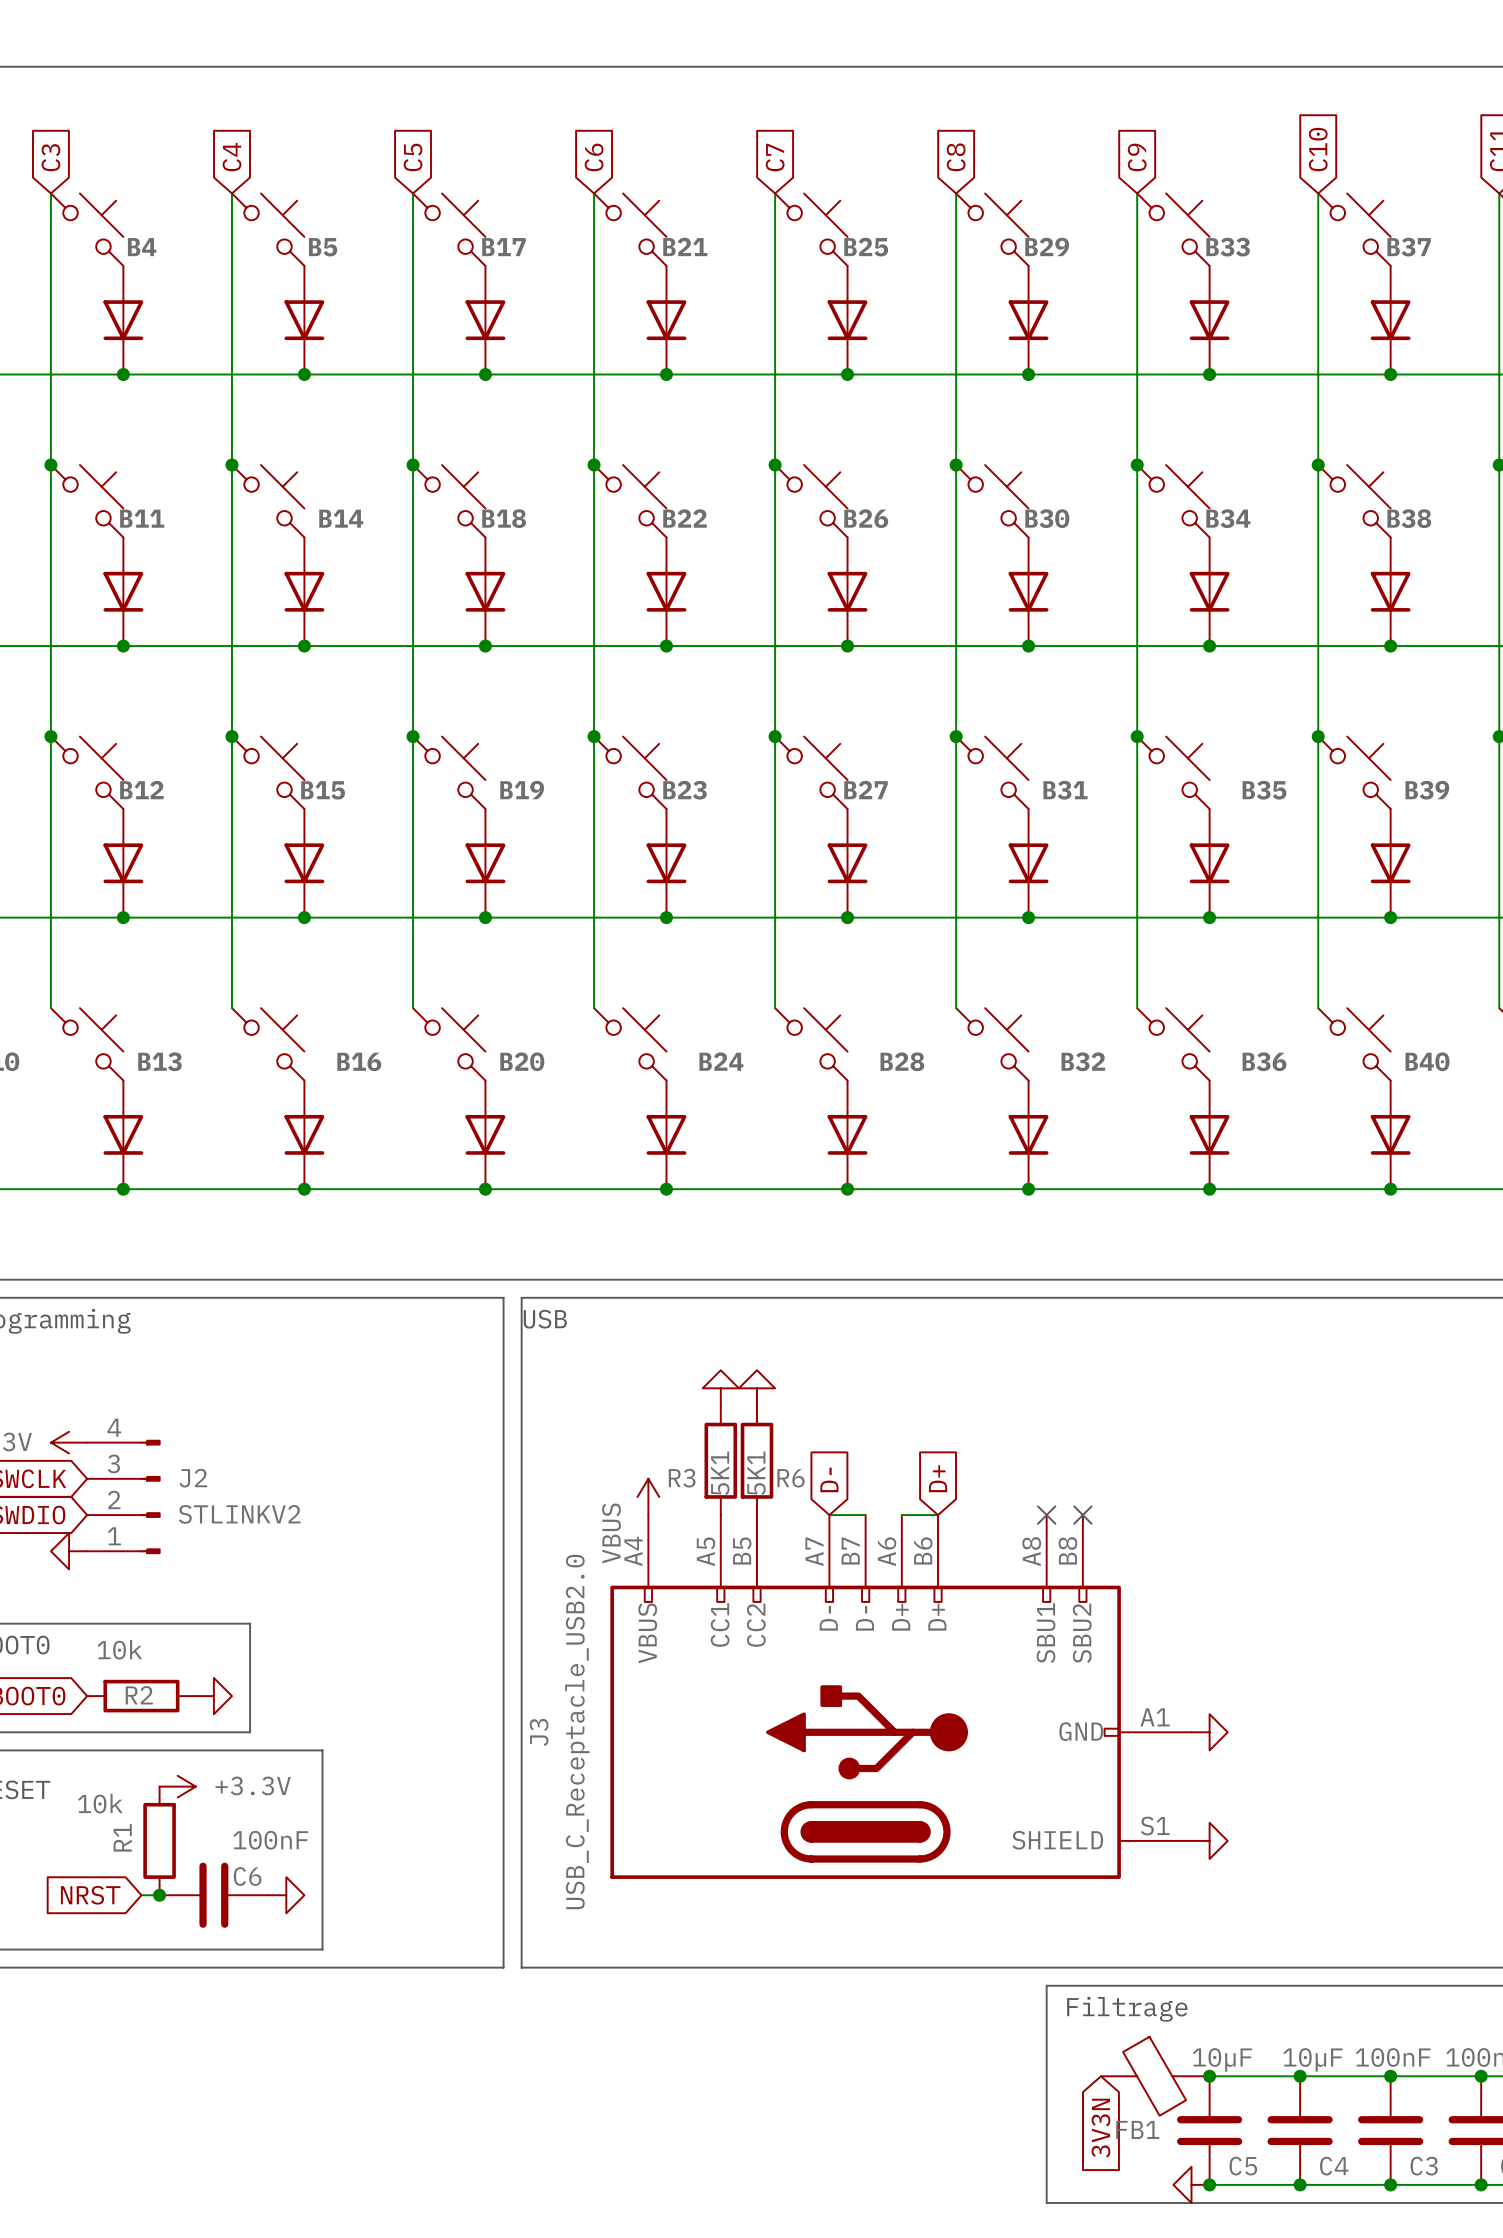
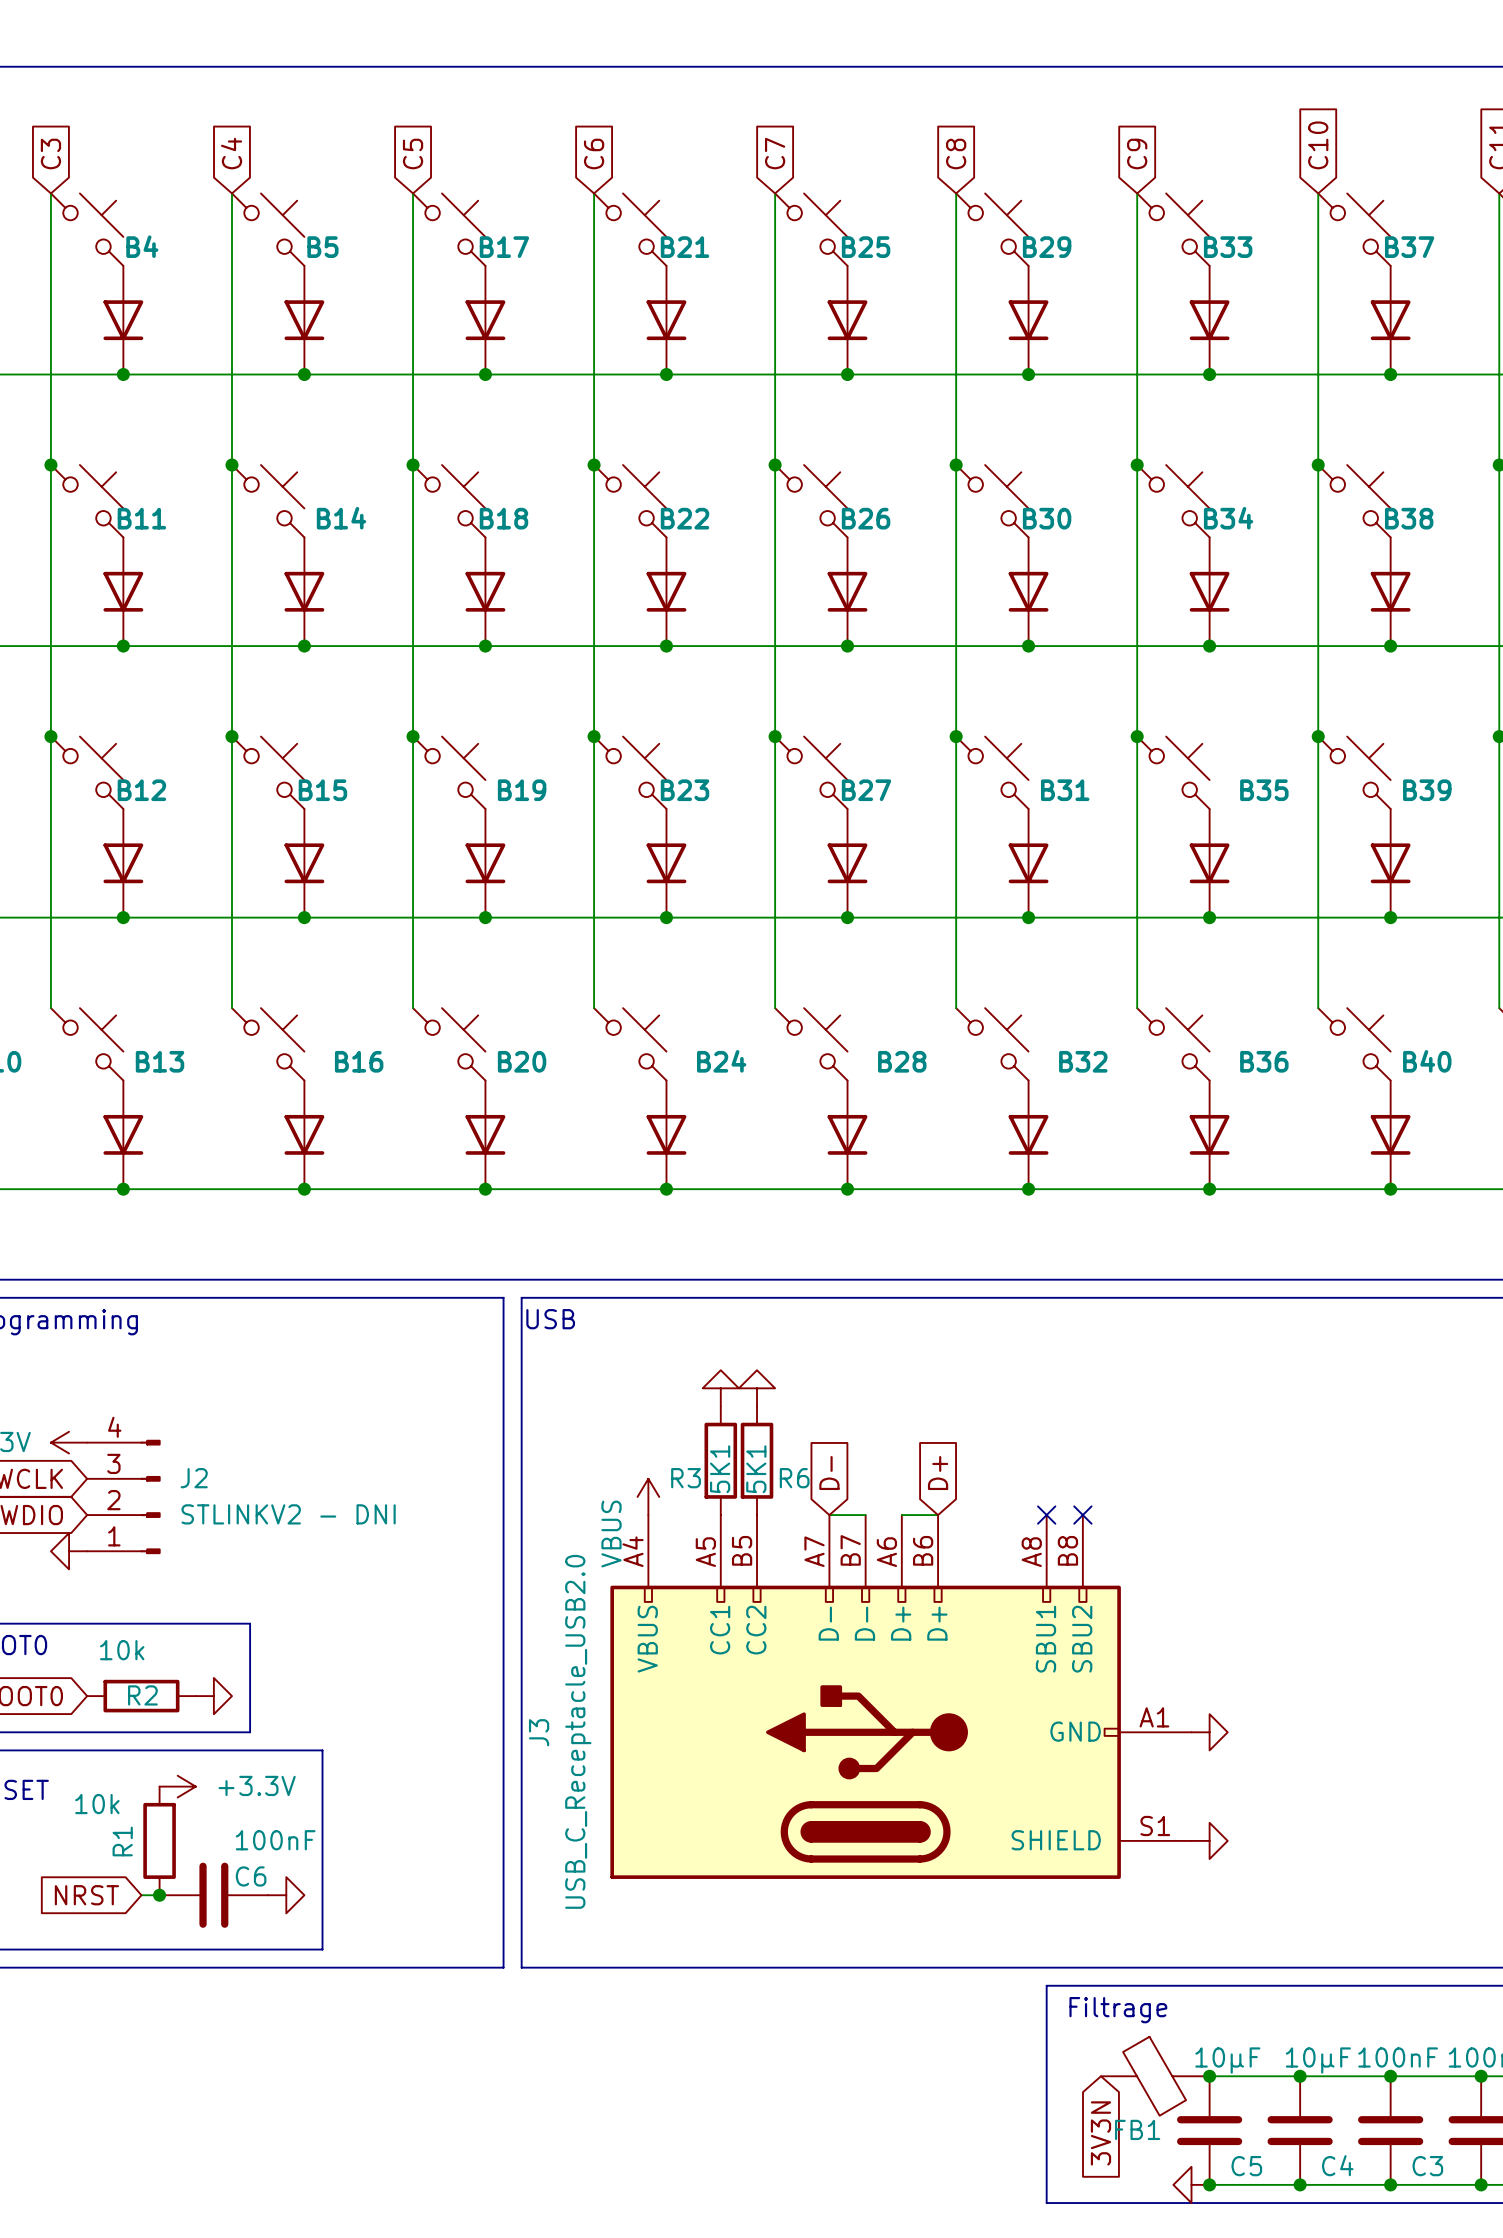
J2 value: STLINKV2 (239, 1514) -> STLINKV2 - DNI (288, 1514)

